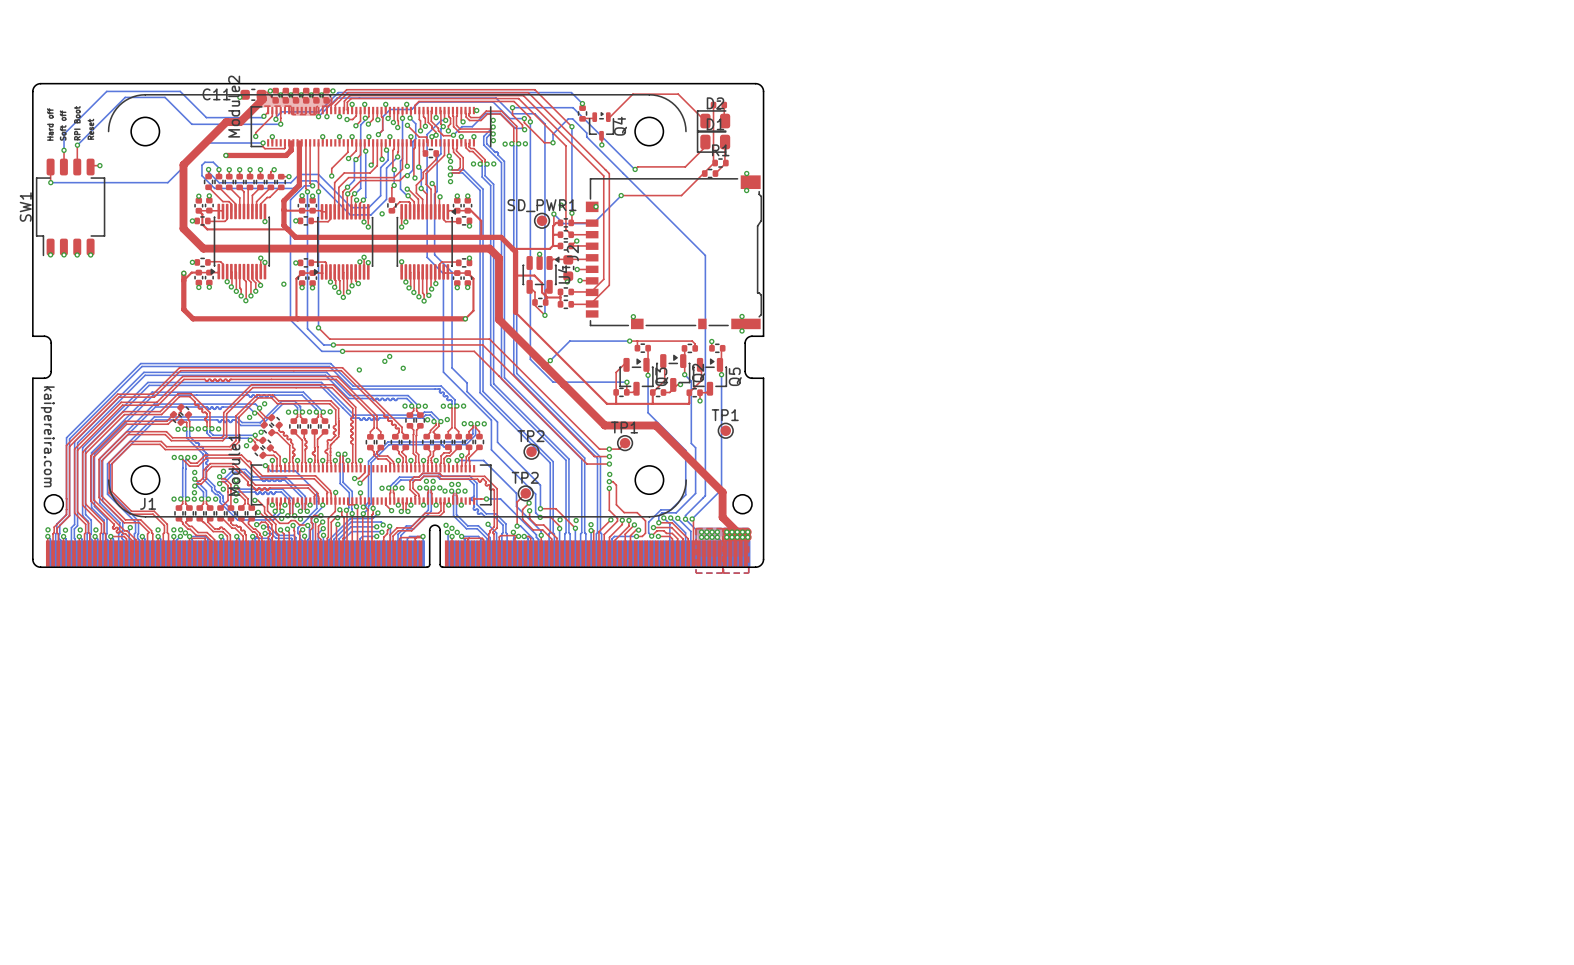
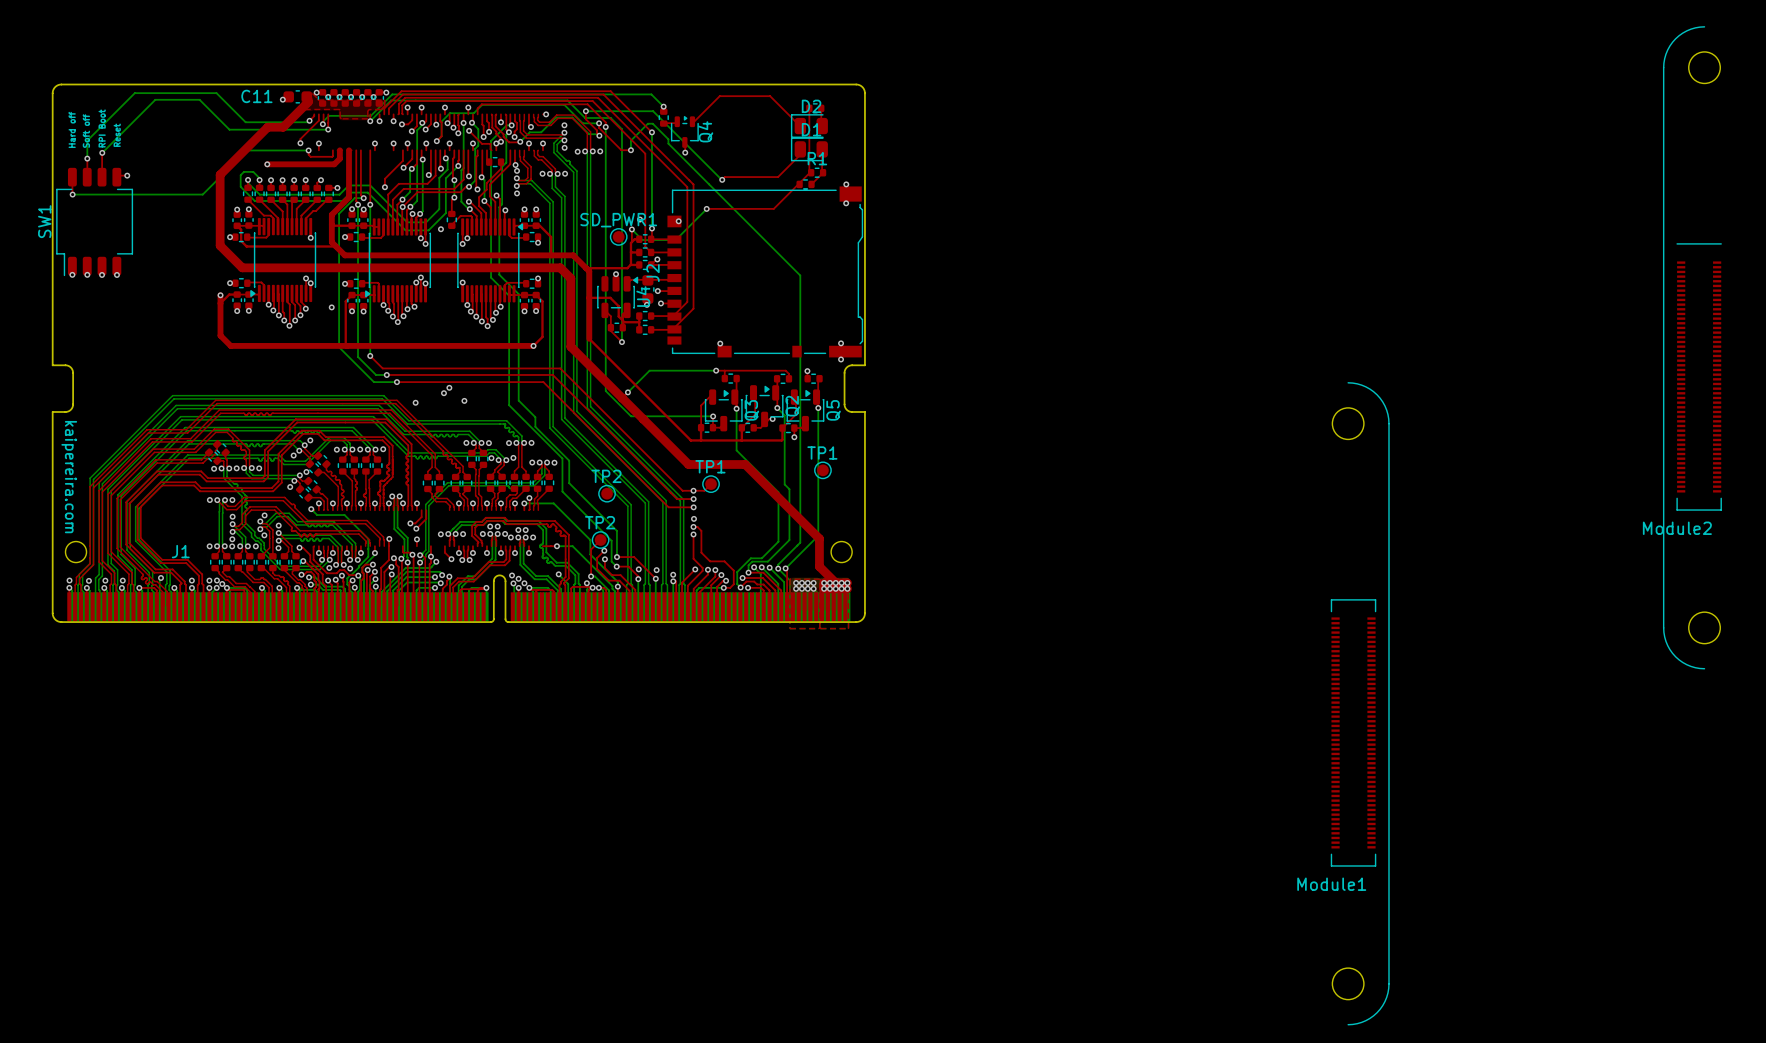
Module2 rotation: 0° (397, 120) -> 90° counterclockwise (1692, 347)
Module2 position: (397, 120) -> (1692, 347)
Module1 rotation: 0° (397, 490) -> 90° counterclockwise (1360, 703)
Module1 position: (397, 490) -> (1360, 703)

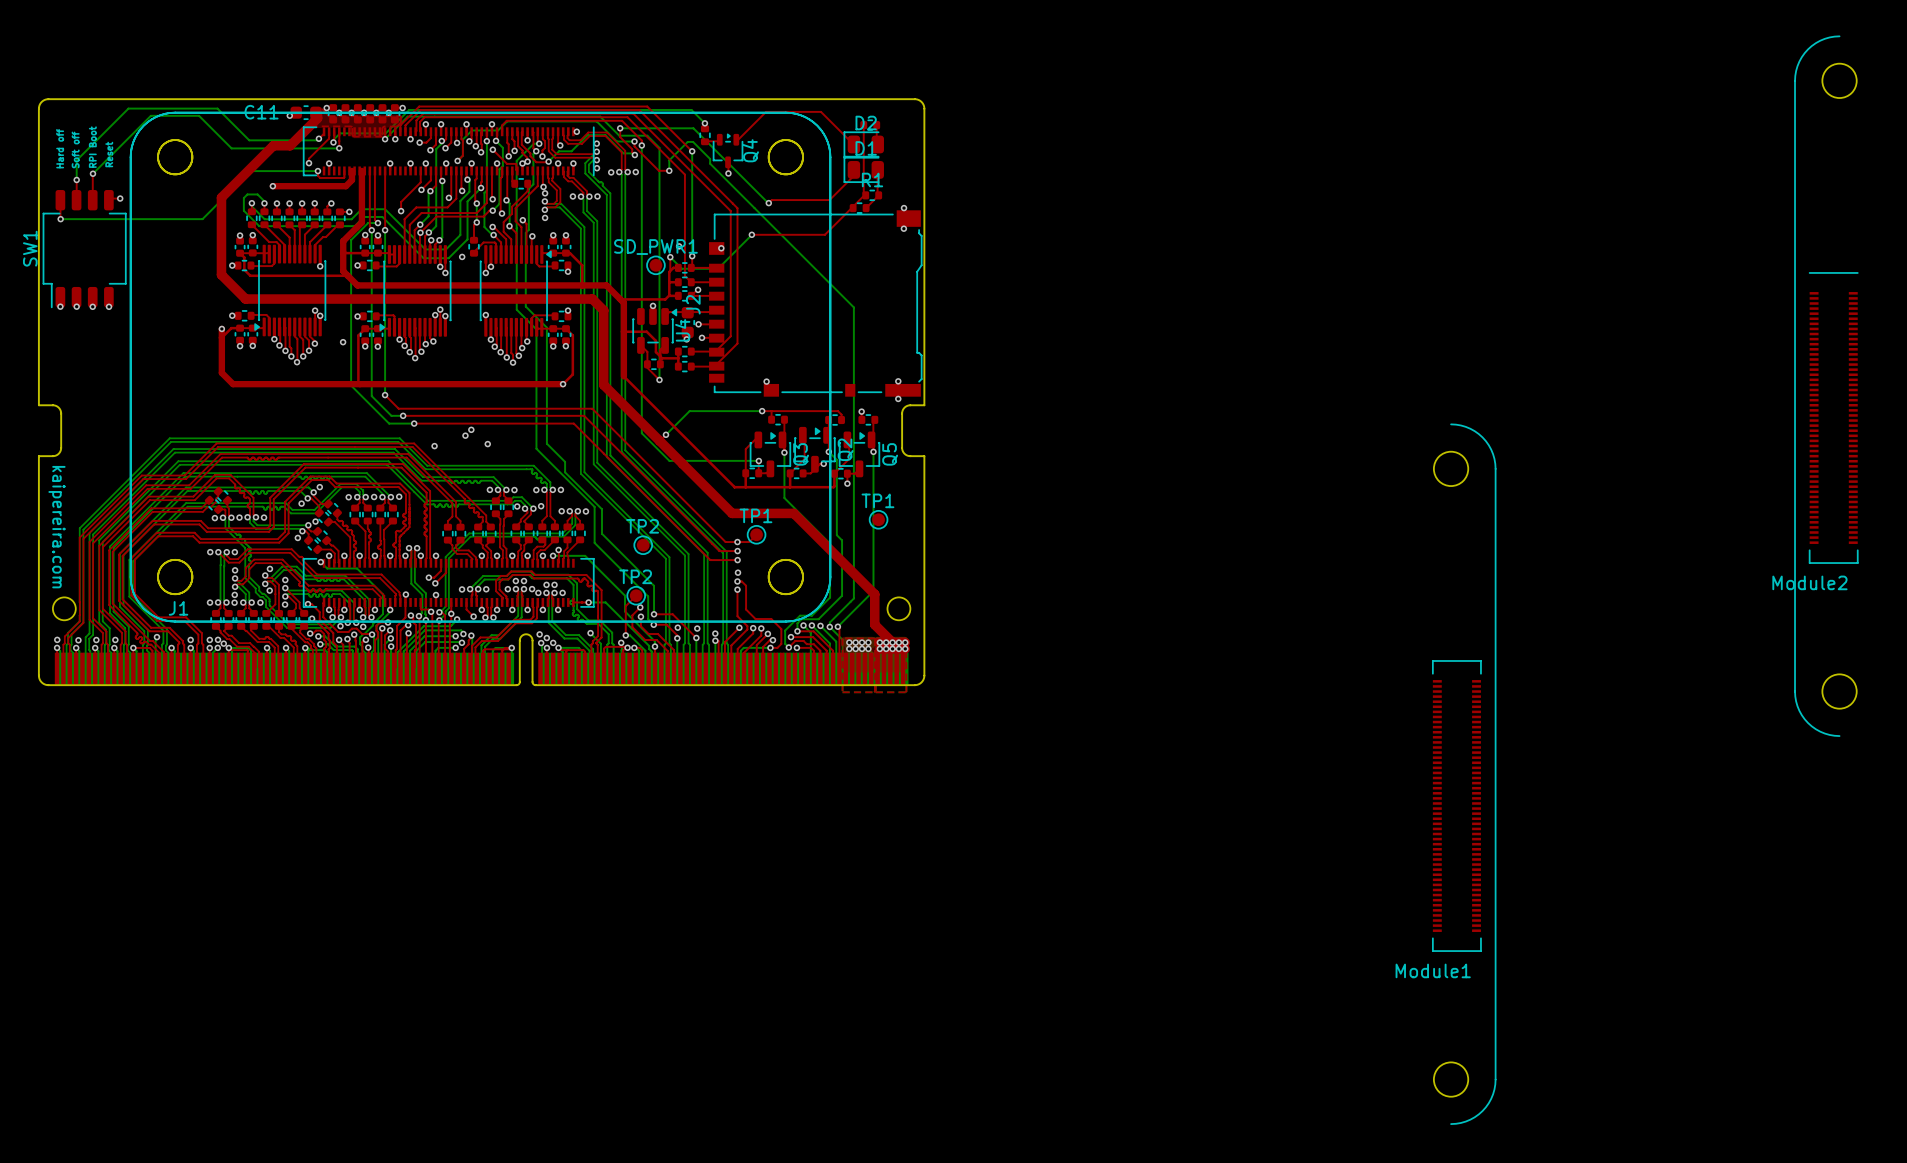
part: none -> (480, 367)
part: none -> (480, 367)

